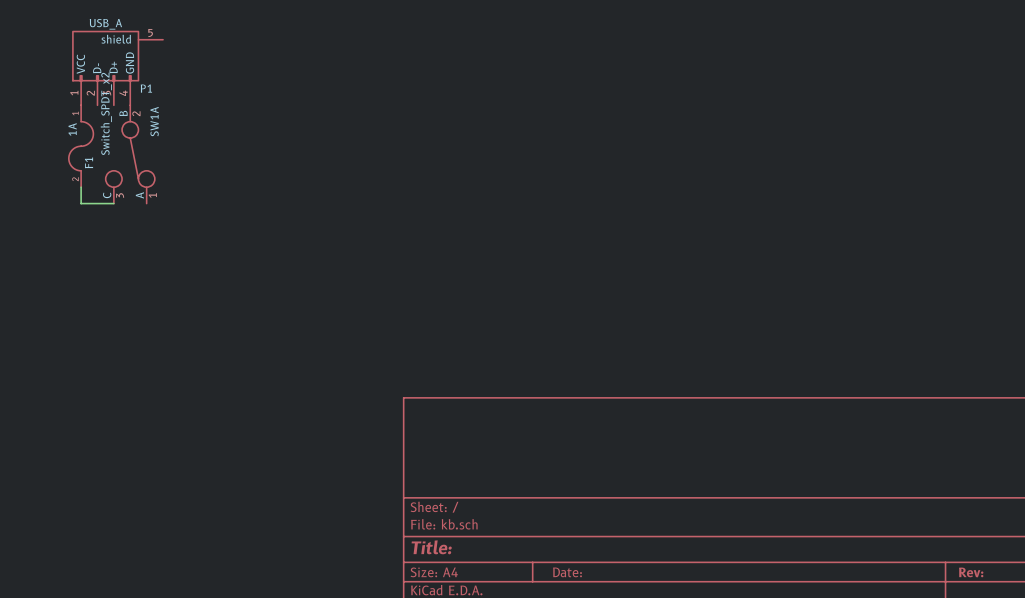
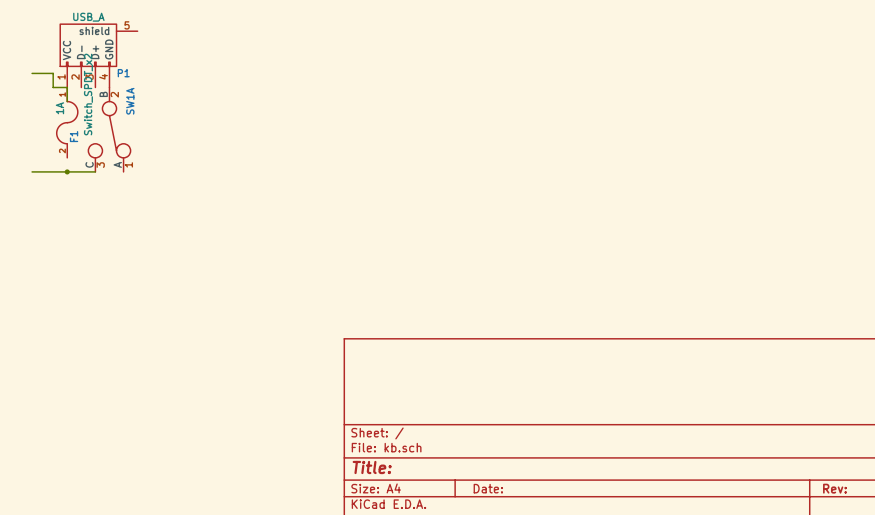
wire: none -> (32, 73) (53, 73) (53, 87) (67, 87) (67, 101)
wire: (81, 187) (81, 203) -> (32, 171) (67, 171)
junction: none -> (67, 171)

